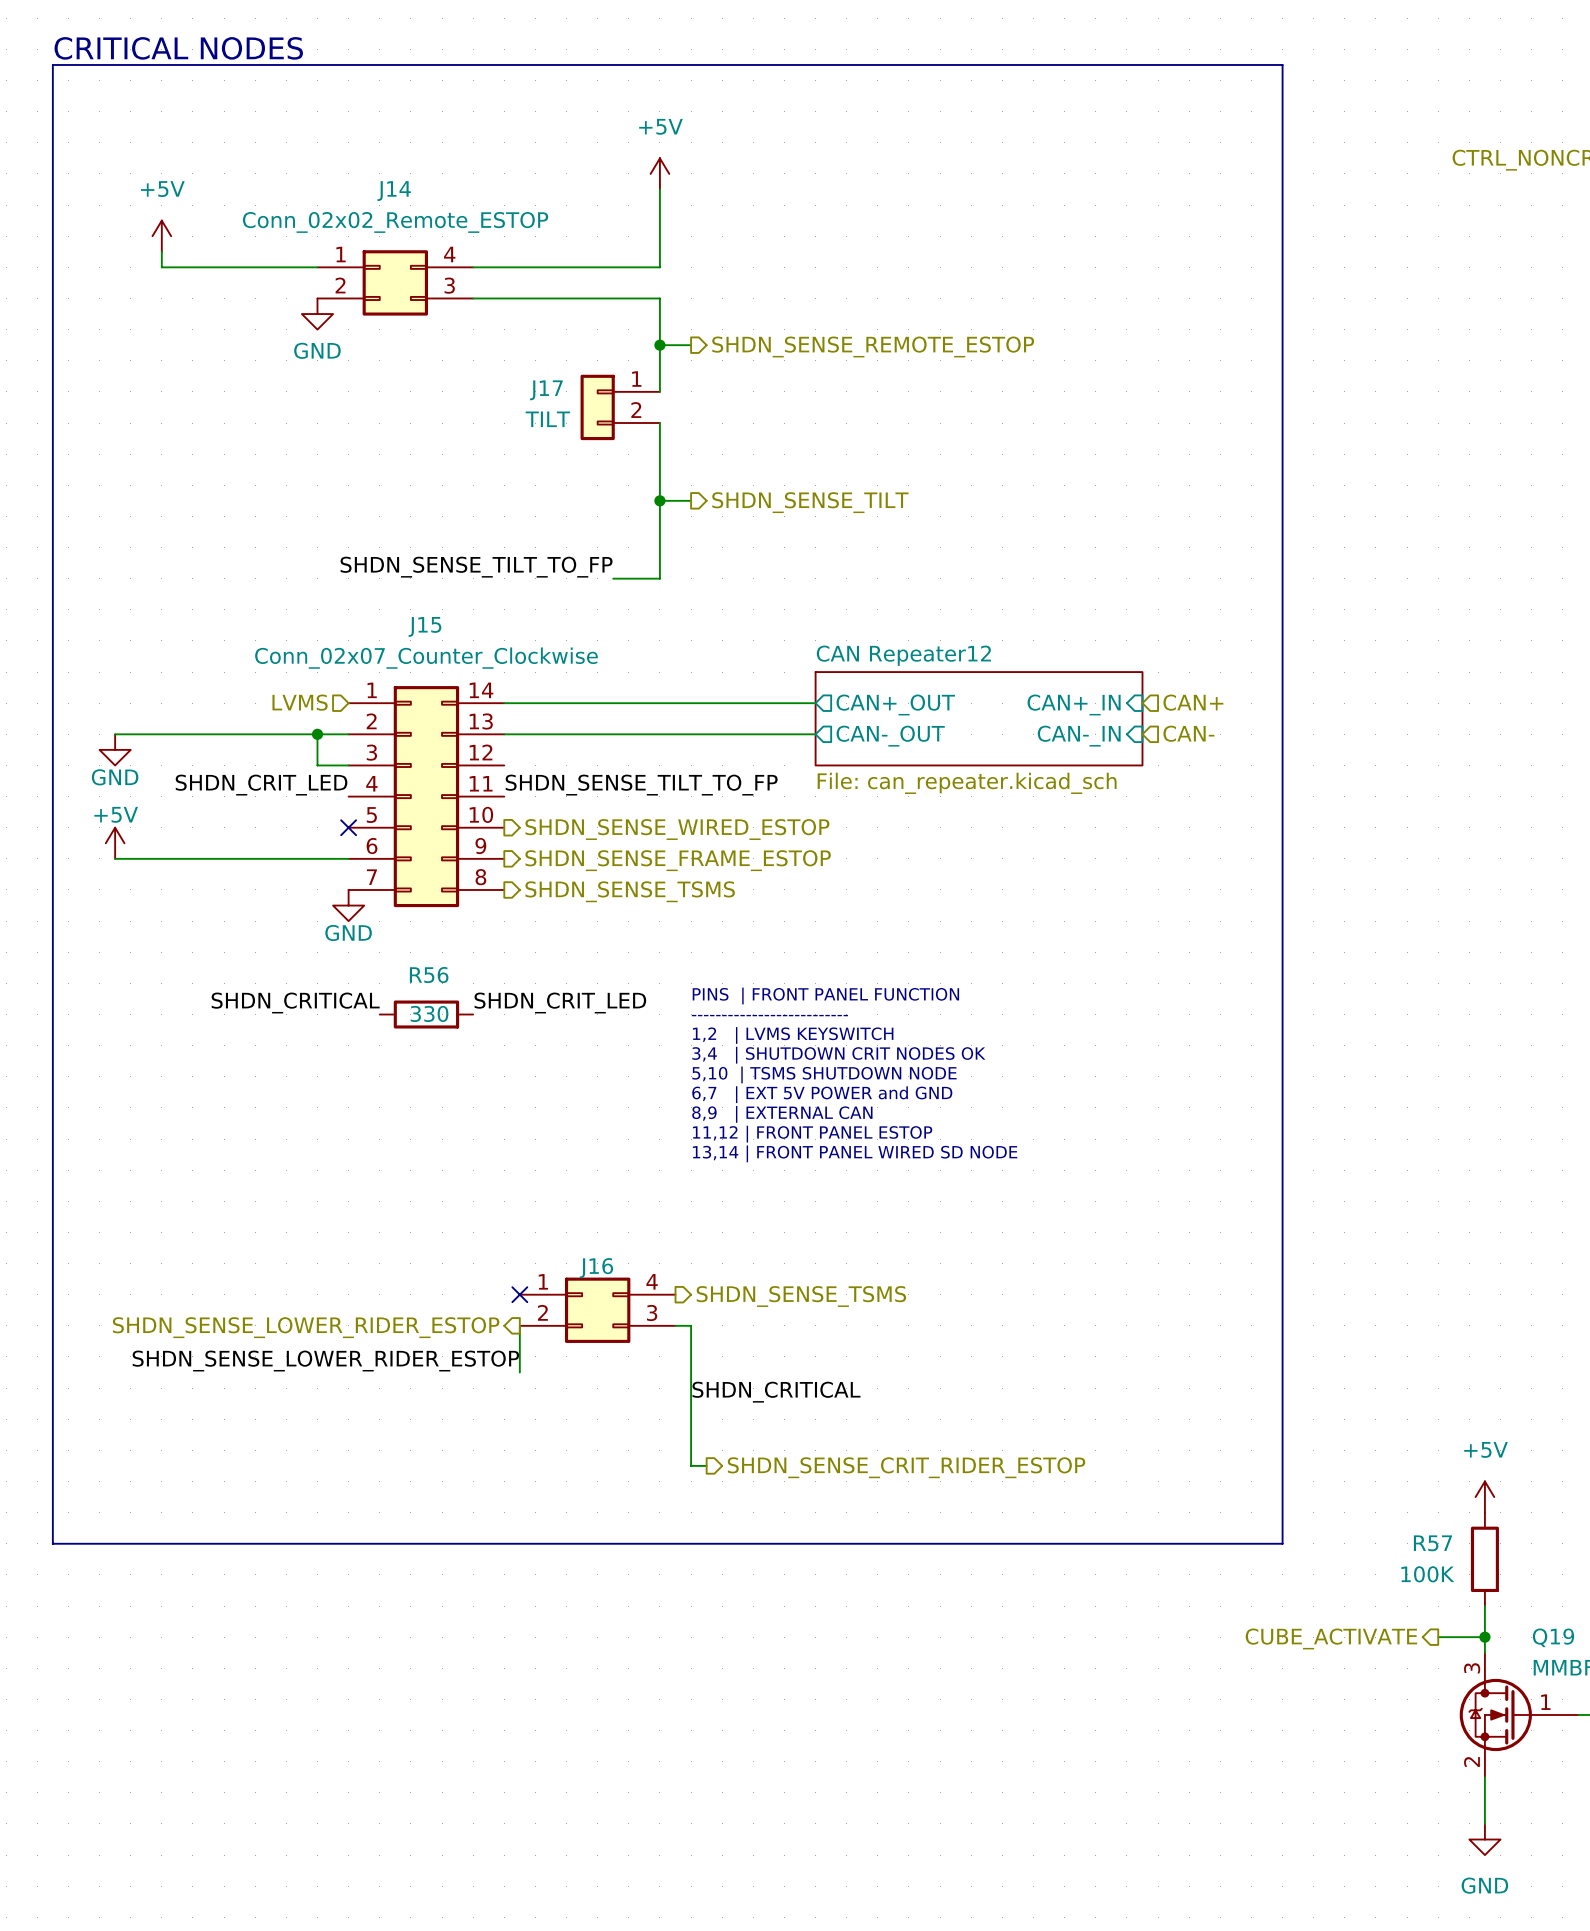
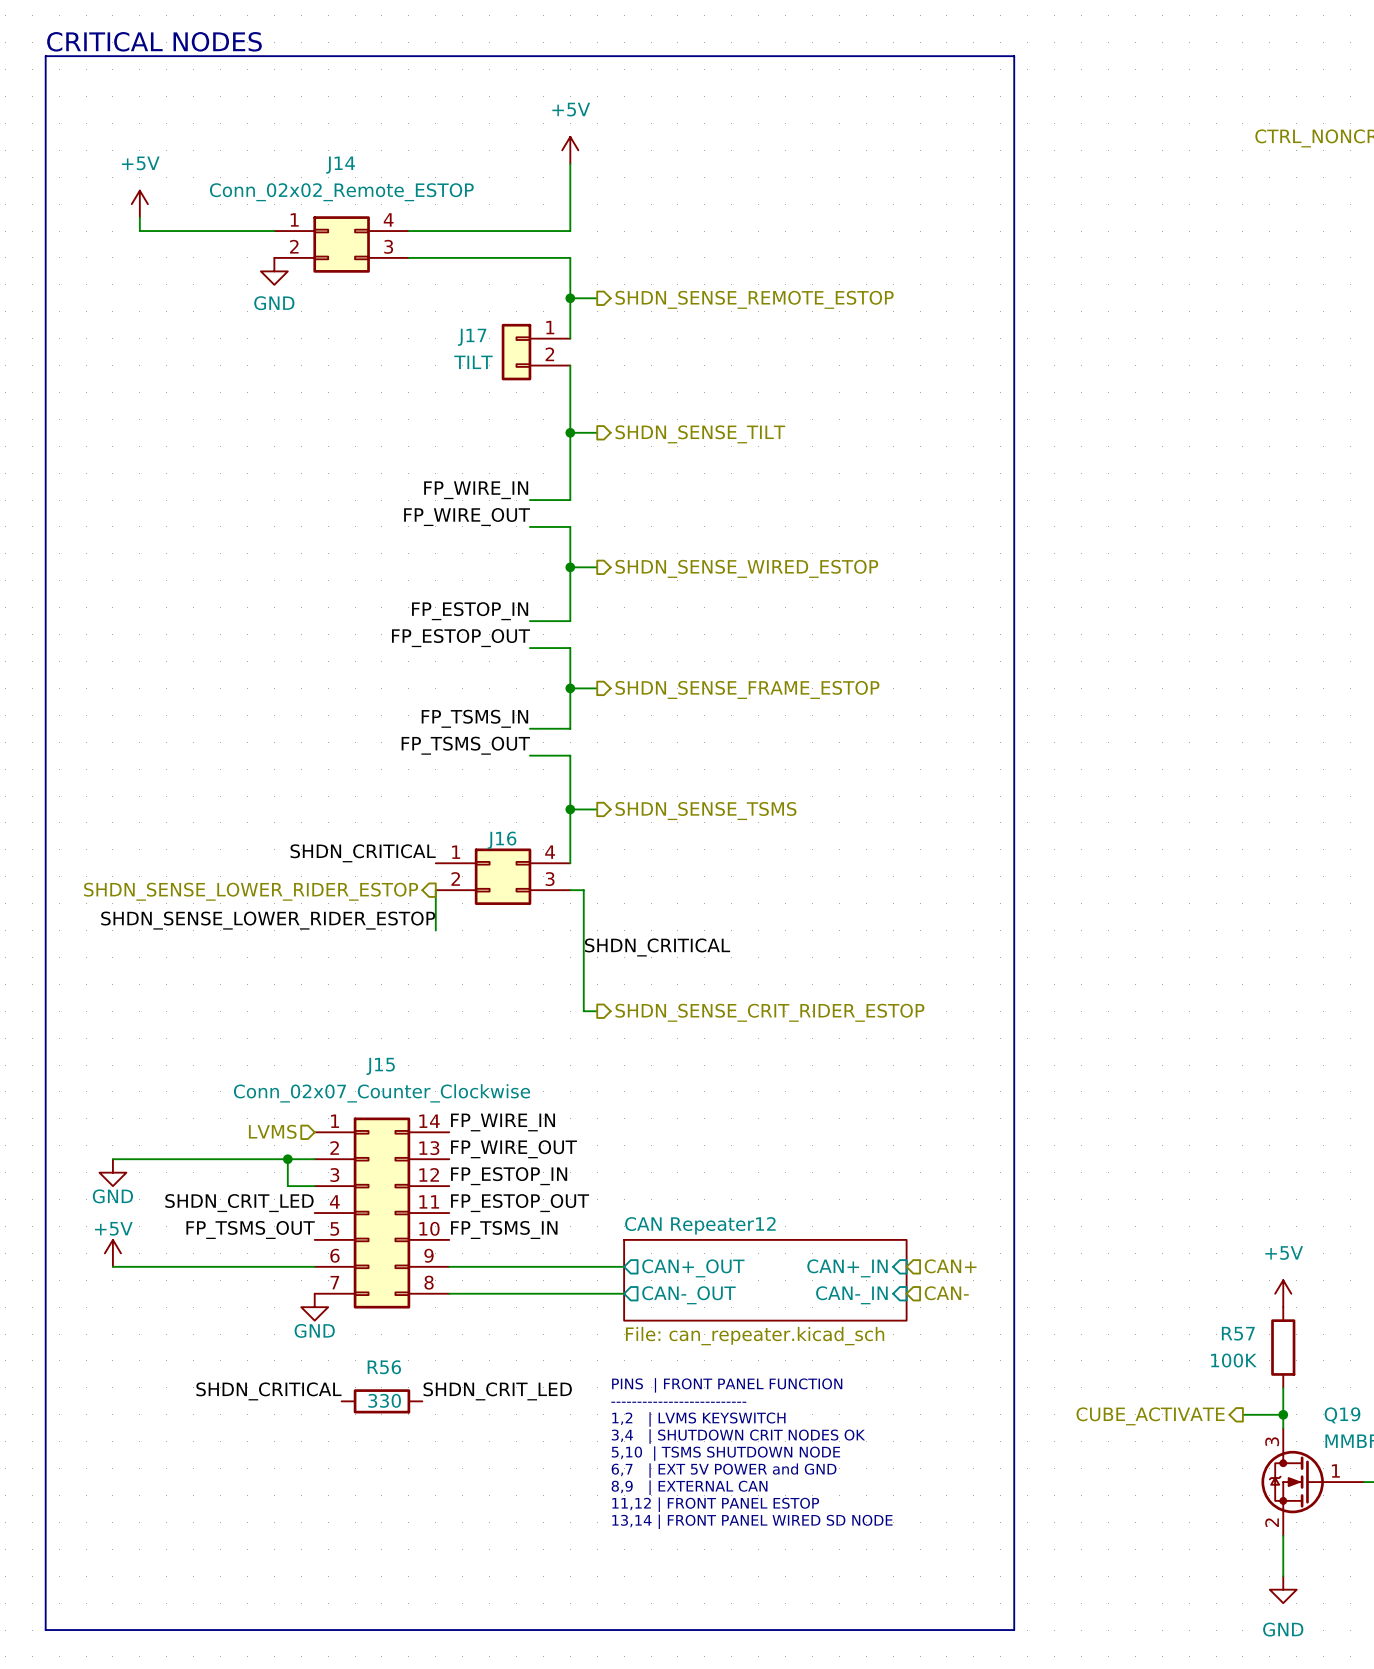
line: (1173, 64) (1282, 64) (1282, 1543) (52, 1543) -> (1014, 56) (1014, 1630) (45, 1630) (45, 1334)
label: SHDN_SENSE_TILT_TO_FP (476, 567) -> FP_WIRE_IN (476, 490)
label: none -> FP_WIRE_OUT (467, 517)
wire: none -> (529, 526) (570, 526) (570, 621) (529, 621)
wire: none -> (570, 567) (597, 567)
junction: none -> (570, 567)
hierarchical label: LVMS (300, 702) -> none
hierarchical label: CAN+ (1193, 702) -> none
wire: (504, 703) (815, 703) -> none
sheet pin: CAN+_OUT (895, 704) -> none
sheet pin: CAN+_IN (1074, 704) -> none
label: none -> FP_ESTOP_IN (470, 611)
sheet CAN Repeater12 position: (979, 718) -> (765, 1280)
hierarchical label: CAN- (1188, 733) -> none
wire: (115, 734) (348, 734) -> none
wire: (317, 734) (317, 765) (348, 765) -> none
junction: (317, 734) -> none
wire: (504, 734) (815, 734) -> none
sheet pin: CAN-_OUT (890, 736) -> none
sheet pin: CAN-_IN (1079, 736) -> none
label: none -> FP_ESTOP_OUT (460, 638)
power symbol: GND (115, 749) -> none
wire: none -> (529, 648) (570, 648) (570, 728) (529, 728)
label: SHDN_CRIT_LED (261, 785) -> none
label: SHDN_SENSE_TILT_TO_FP (641, 785) -> none
J15 position: (426, 796) -> (381, 1213)
wire: none -> (570, 688) (597, 688)
junction: none -> (570, 688)
no-connect mark: (348, 827) -> none
hierarchical label position: SHDN_SENSE_WIRED_ESTOP (677, 829) -> SHDN_SENSE_WIRED_ESTOP (746, 568)
label: none -> FP_TSMS_IN (474, 718)
power symbol: +5V (115, 843) -> none
wire: (115, 858) (348, 858) -> none
hierarchical label position: SHDN_SENSE_FRAME_ESTOP (678, 860) -> SHDN_SENSE_FRAME_ESTOP (747, 689)
label: none -> FP_TSMS_OUT (465, 745)
wire: none -> (529, 755) (570, 755) (570, 863)
hierarchical label: SHDN_SENSE_TSMS (630, 891) -> none
power symbol: GND (348, 905) -> none
wire: none -> (570, 809) (597, 809)
junction: none -> (570, 809)
hierarchical label: none -> SHDN_SENSE_TSMS (705, 811)
text: PINS | FRONT PANEL FUNCTION (825, 996) -> none
label position: SHDN_CRITICAL (295, 1003) -> SHDN_CRITICAL (363, 853)
label: SHDN_CRIT_LED (560, 1003) -> none
R56 position: (426, 1014) -> (381, 1401)
text: -------------------------- (769, 1015) -> none
wire: none -> (570, 890) (583, 890) (583, 1011) (597, 1011)
text: 1,2 | LVMS KEYSWITCH (793, 1035) -> none
text: 3,4 | SHUTDOWN CRIT NODES OK (838, 1055) -> none
label: none -> SHDN_SENSE_LOWER_RIDER_ESTOP (268, 920)
text: 5,10 | TSMS SHUTDOWN NODE (824, 1074) -> none
text: 6,7 | EXT 5V POWER and GND (822, 1094) -> none
label: none -> SHDN_CRITICAL (657, 947)
text: 8,9 | EXTERNAL CAN (782, 1114) -> none
text: 11,12 | FRONT PANEL ESTOP (812, 1134) -> none
text: 13,14 | FRONT PANEL WIRED SD NODE (855, 1153) -> none
no-connect mark: (519, 1294) -> none
hierarchical label: SHDN_SENSE_TSMS (801, 1296) -> none
label: none -> FP_WIRE_IN (503, 1122)
hierarchical label: none -> LVMS (272, 1131)
J16 position: (597, 1310) -> (503, 876)
wire: (519, 1325) (519, 1372) -> (435, 890) (435, 930)
wire: (675, 1325) (691, 1325) (691, 1465) -> (449, 1266) (597, 1266)
hierarchical label position: SHDN_SENSE_LOWER_RIDER_ESTOP (306, 1327) -> SHDN_SENSE_LOWER_RIDER_ESTOP (251, 891)
label: none -> FP_WIRE_OUT (514, 1149)
wire: none -> (112, 1159) (314, 1159)
wire: none -> (287, 1159) (287, 1186) (314, 1186)
junction: none -> (287, 1159)
power symbol: none -> GND (112, 1172)
label: SHDN_SENSE_LOWER_RIDER_ESTOP (325, 1361) -> FP_ESTOP_IN (509, 1176)
label: none -> SHDN_CRIT_LED (239, 1203)
label: none -> FP_ESTOP_OUT (520, 1203)
label: SHDN_CRITICAL (776, 1392) -> none
label: none -> FP_TSMS_OUT (250, 1229)
label: none -> FP_TSMS_IN (504, 1229)
power symbol: none -> +5V (112, 1253)
wire: none -> (112, 1266) (314, 1266)
wire: none -> (610, 1266) (624, 1266)
hierarchical label: none -> CAN+ (950, 1266)
sheet pin: none -> CAN+_OUT (693, 1268)
hierarchical label position: SHDN_SENSE_CRIT_RIDER_ESTOP (906, 1467) -> SHDN_SENSE_CRIT_RIDER_ESTOP (769, 1012)
sheet pin: none -> CAN+_IN (847, 1268)
hierarchical label: none -> CAN- (946, 1293)
wire: none -> (449, 1293) (624, 1293)
sheet pin: none -> CAN-_OUT (688, 1295)
sheet pin: none -> CAN-_IN (851, 1295)
power symbol: none -> GND (314, 1307)
text: none -> PINS | FRONT PANEL FUNCTION (727, 1385)
label: none -> SHDN_CRITICAL (268, 1391)
label: none -> SHDN_CRIT_LED (497, 1391)
text: none -> -------------------------- (678, 1402)
text: none -> 1,2 | LVMS KEYSWITCH (698, 1419)
text: none -> 3,4 | SHUTDOWN CRIT NODES OK (738, 1436)
text: none -> 5,10 | TSMS SHUTDOWN NODE (725, 1453)
text: none -> 6,7 | EXT 5V POWER and GND (724, 1470)
text: none -> 8,9 | EXTERNAL CAN (689, 1487)
text: none -> 11,12 | FRONT PANEL ESTOP (715, 1504)
text: none -> 13,14 | FRONT PANEL WIRED SD NODE (752, 1521)

